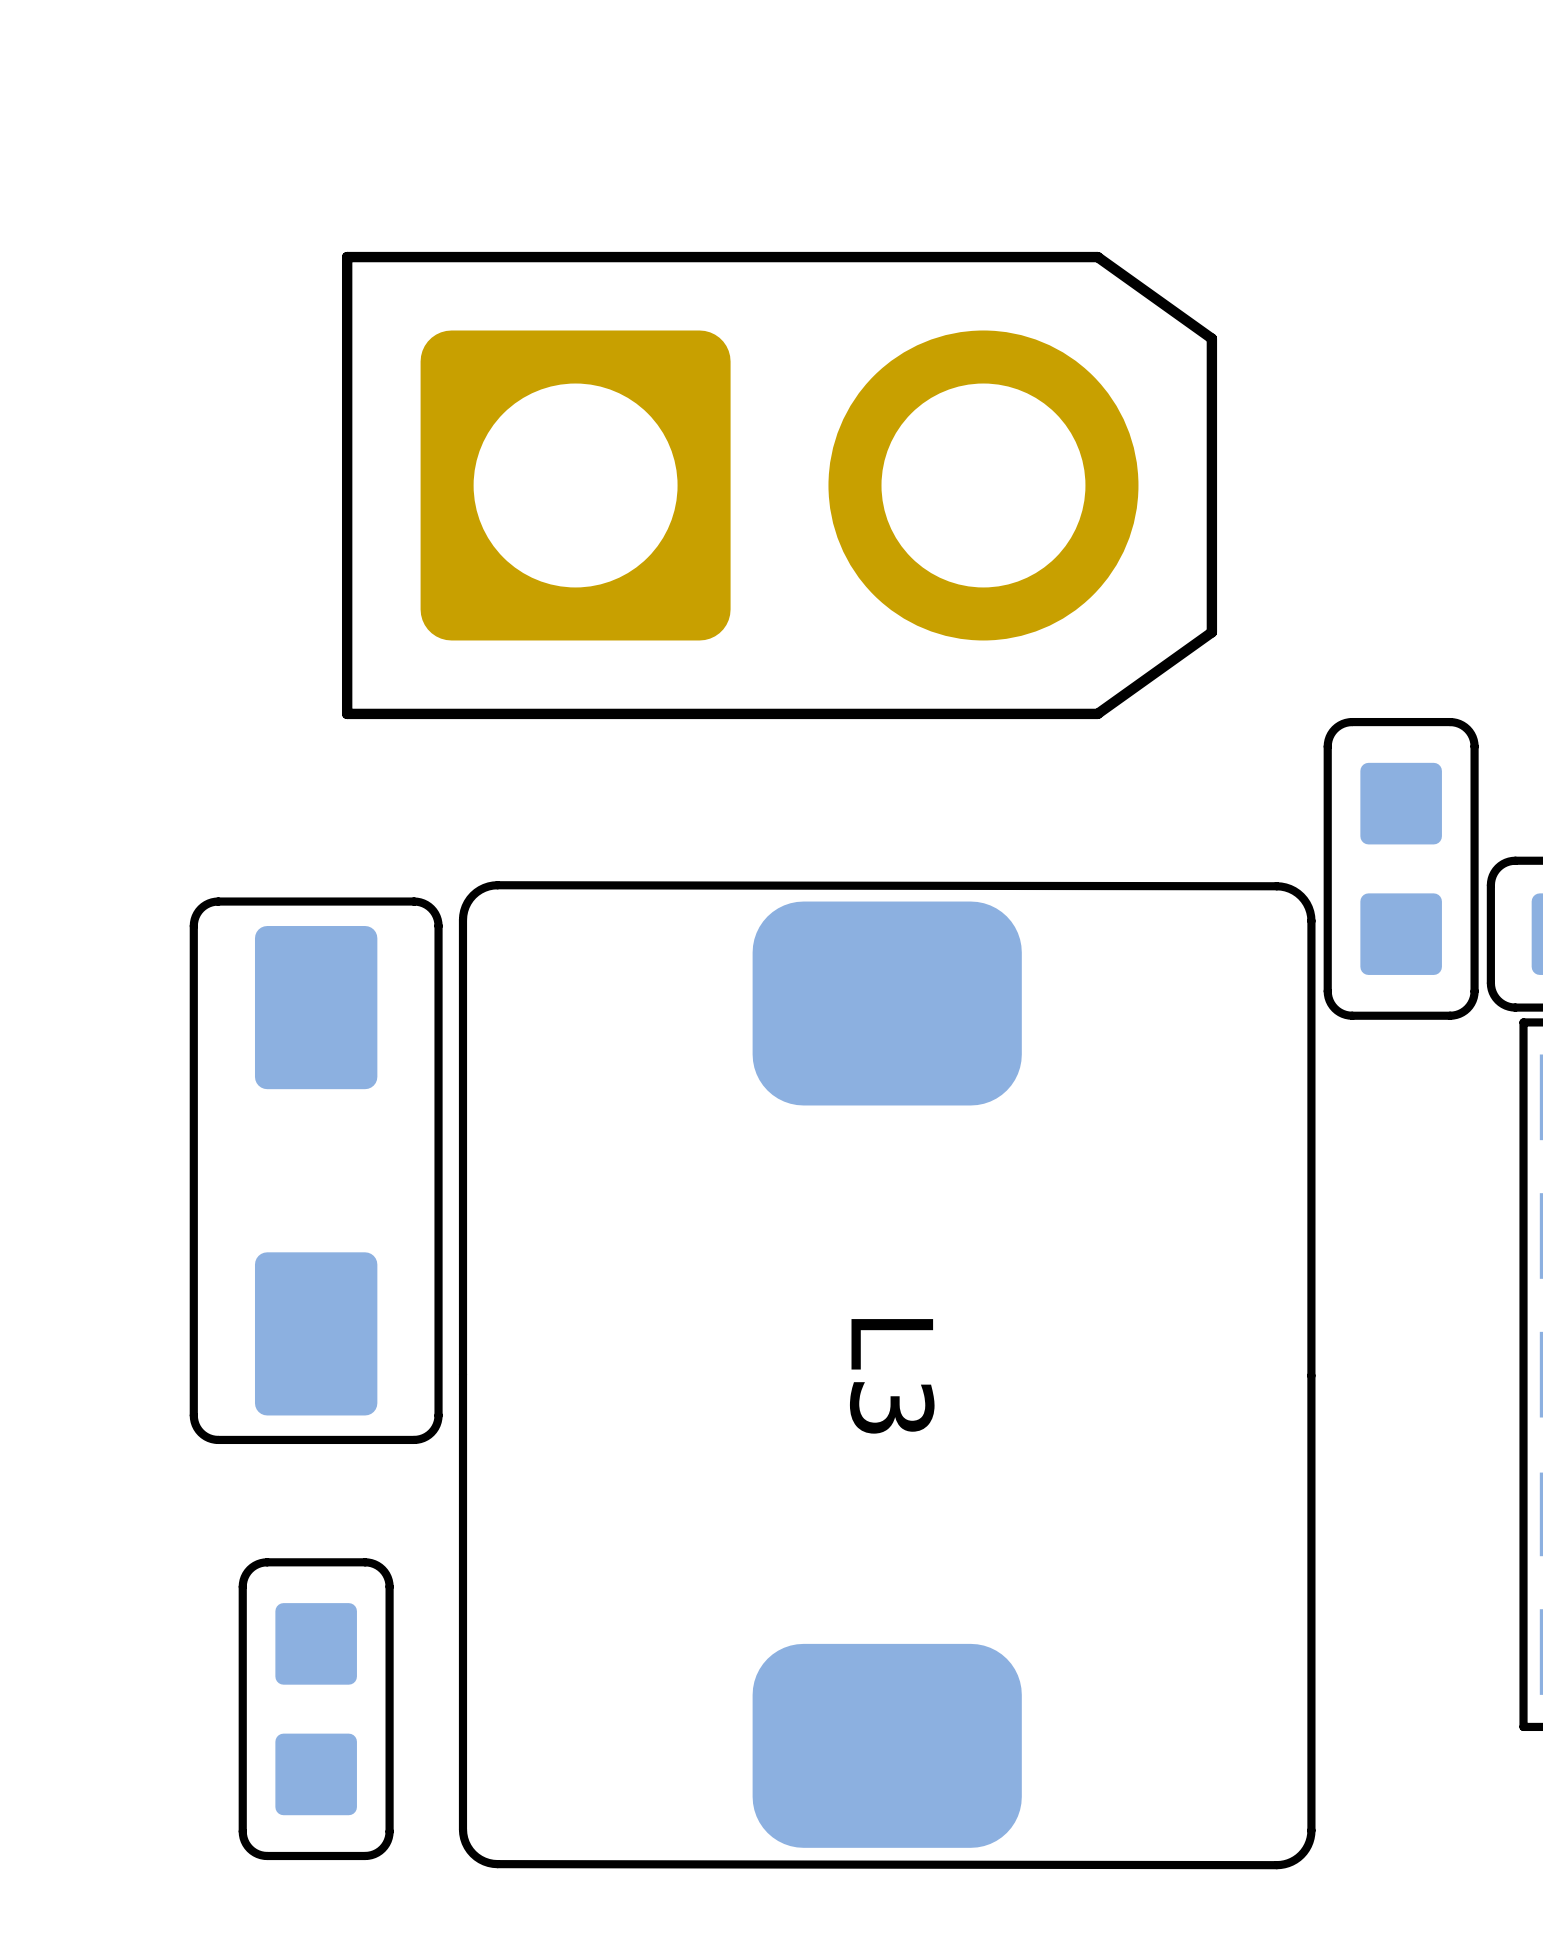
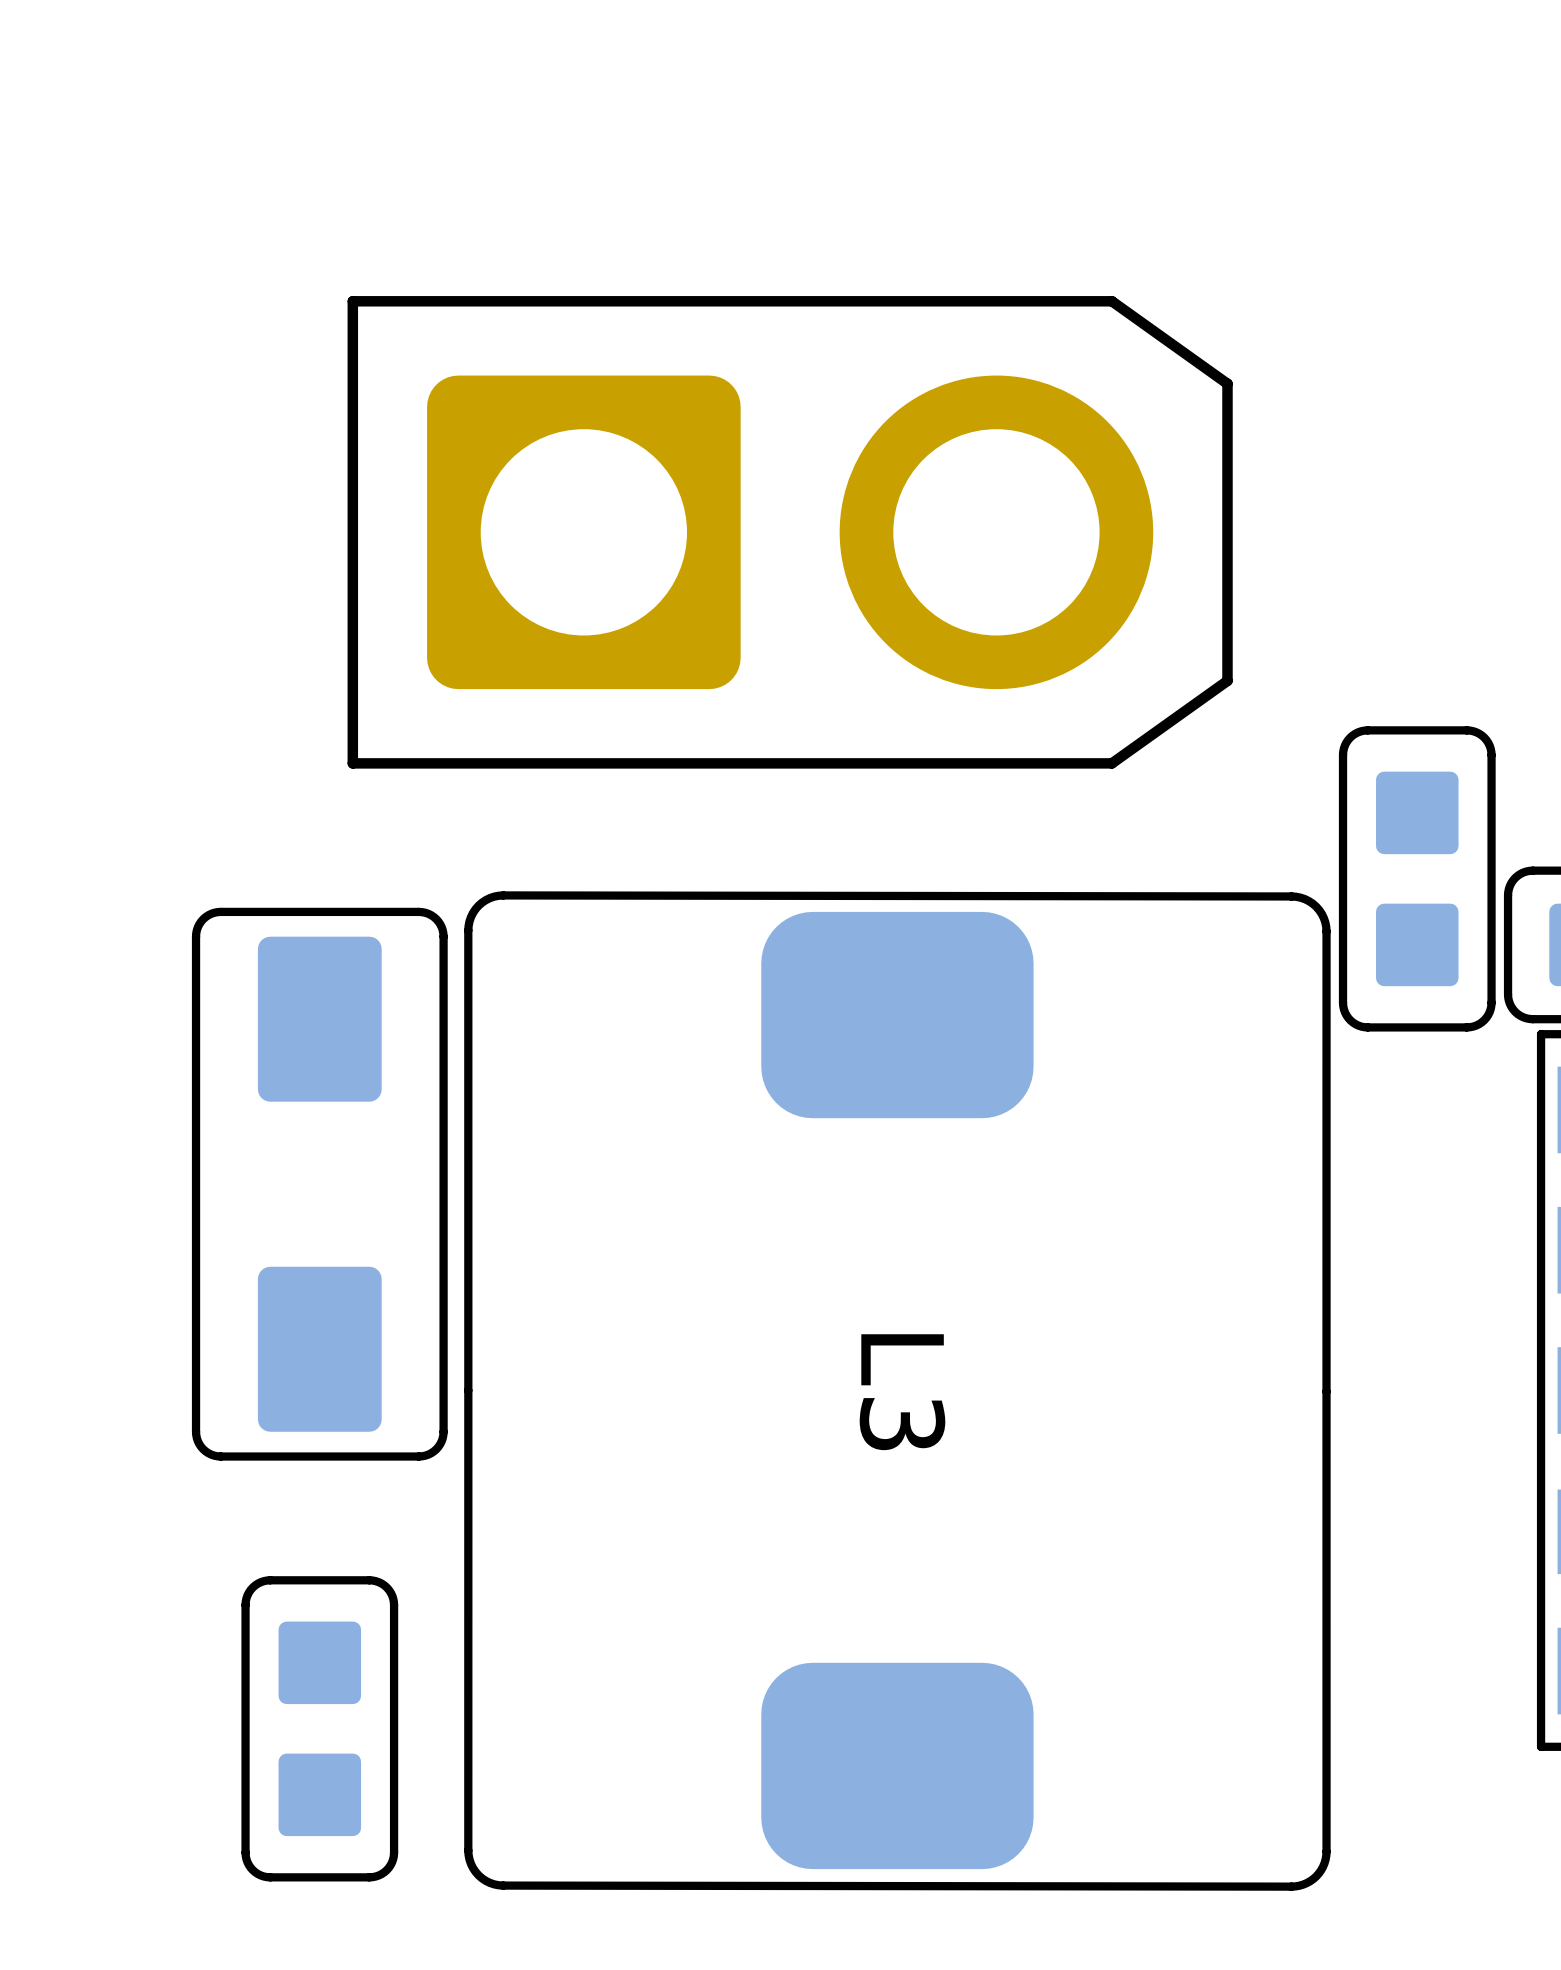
part position: (779, 485) -> (790, 532)

